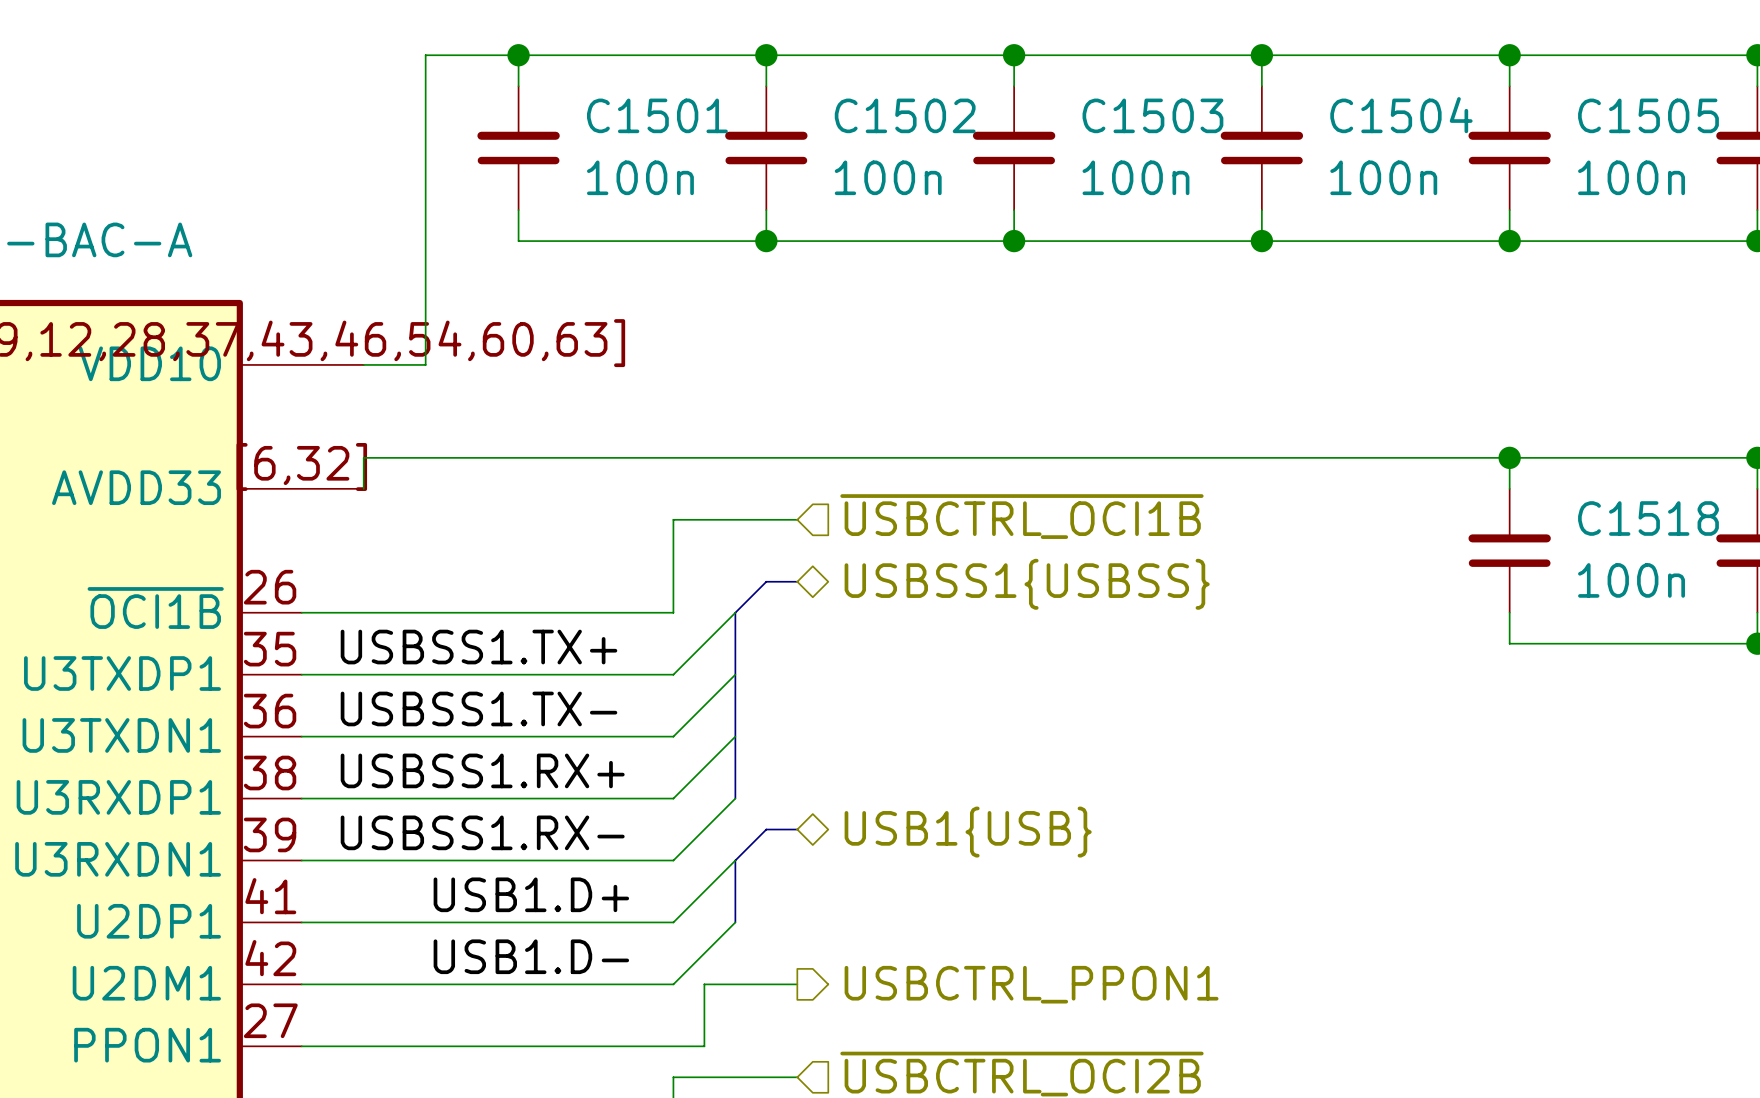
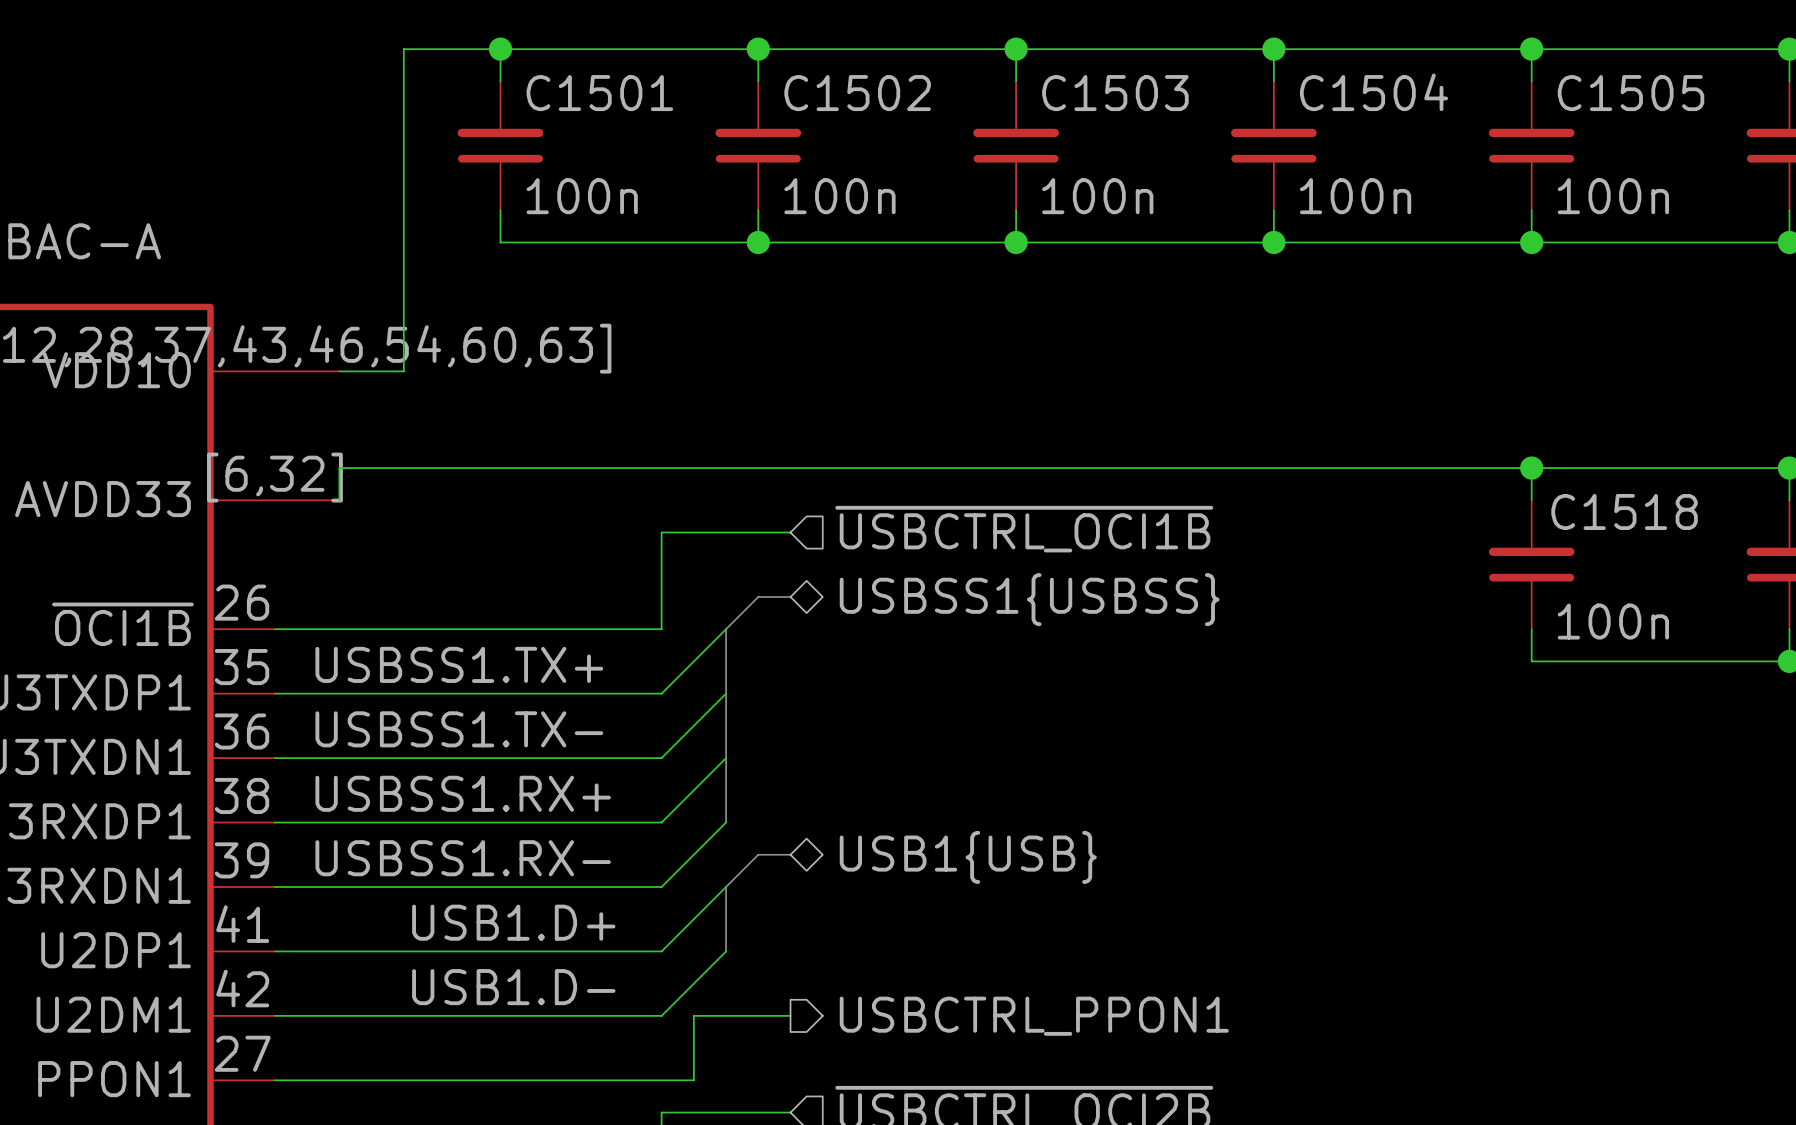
C1501 name position: C1501 (657, 115) -> C1501 (599, 93)
C1502 name position: C1502 (905, 115) -> C1502 (857, 93)
C1503 name position: C1503 (1152, 115) -> C1503 (1115, 93)
C1504 name position: C1504 (1401, 115) -> C1504 (1373, 92)
C1505 name position: C1505 (1648, 115) -> C1505 (1631, 93)
C1501 text position: 100n (640, 177) -> 100n (582, 196)
C1502 text position: 100n (888, 177) -> 100n (839, 196)
C1503 text position: 100n (1135, 177) -> 100n (1097, 196)
C1504 text position: 100n (1383, 177) -> 100n (1355, 196)
C1505 text position: 100n (1631, 177) -> 100n (1613, 196)
C1518 name position: C1518 (1648, 518) -> C1518 (1624, 511)
C1518 text position: 100n (1631, 580) -> 100n (1613, 621)

